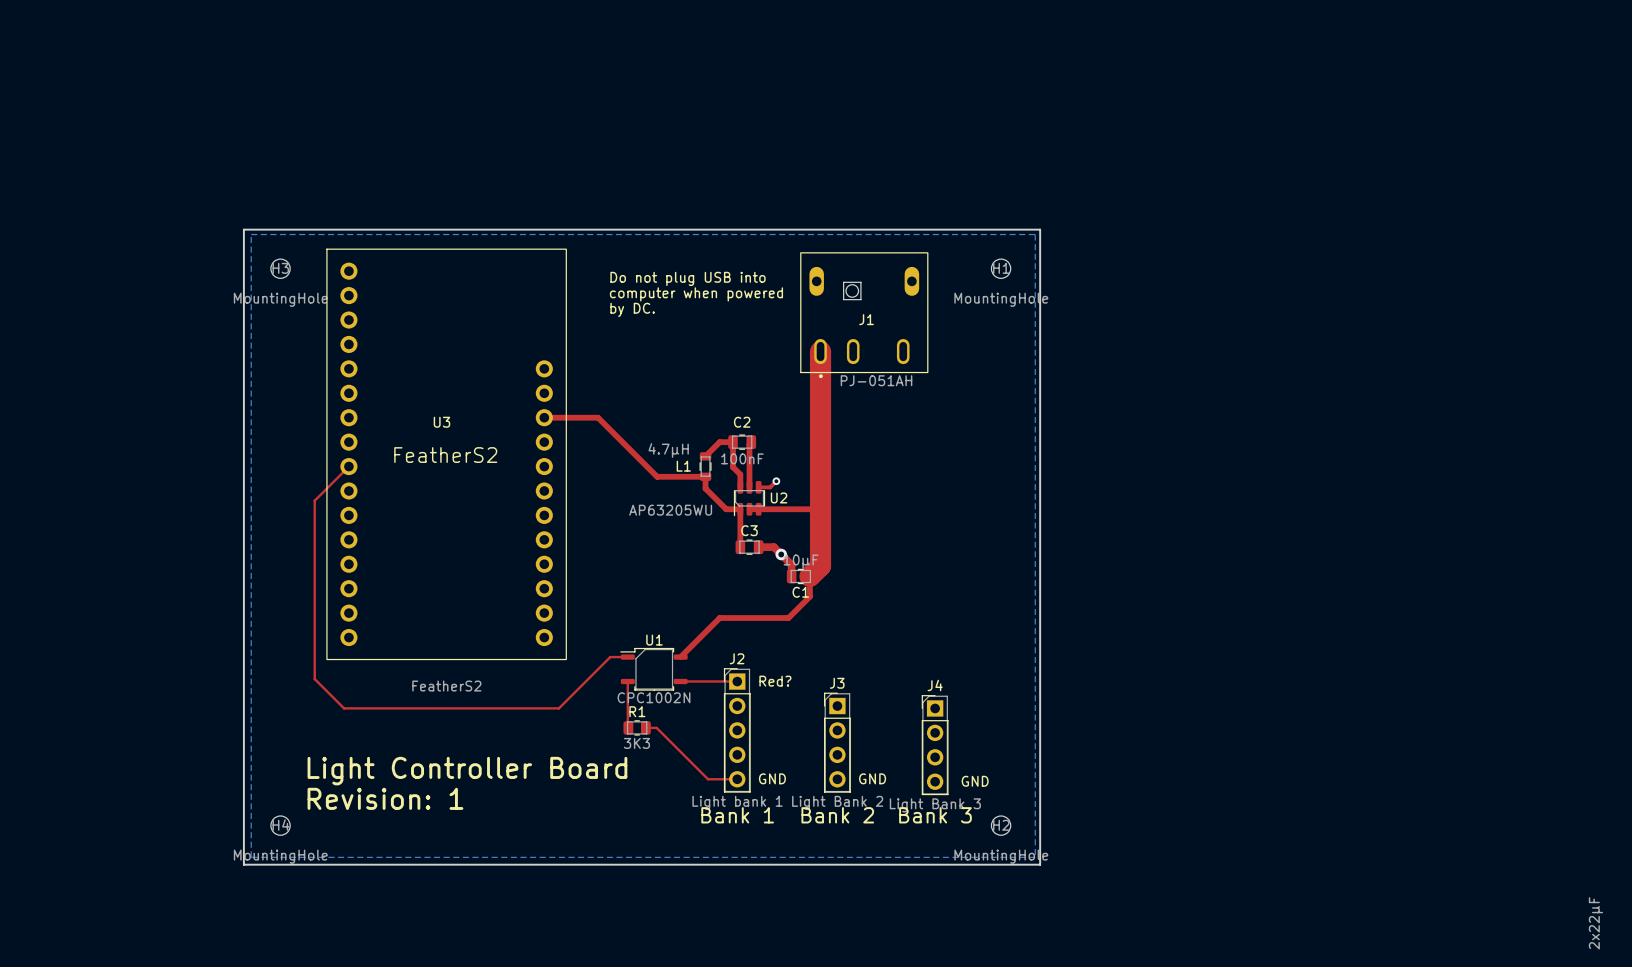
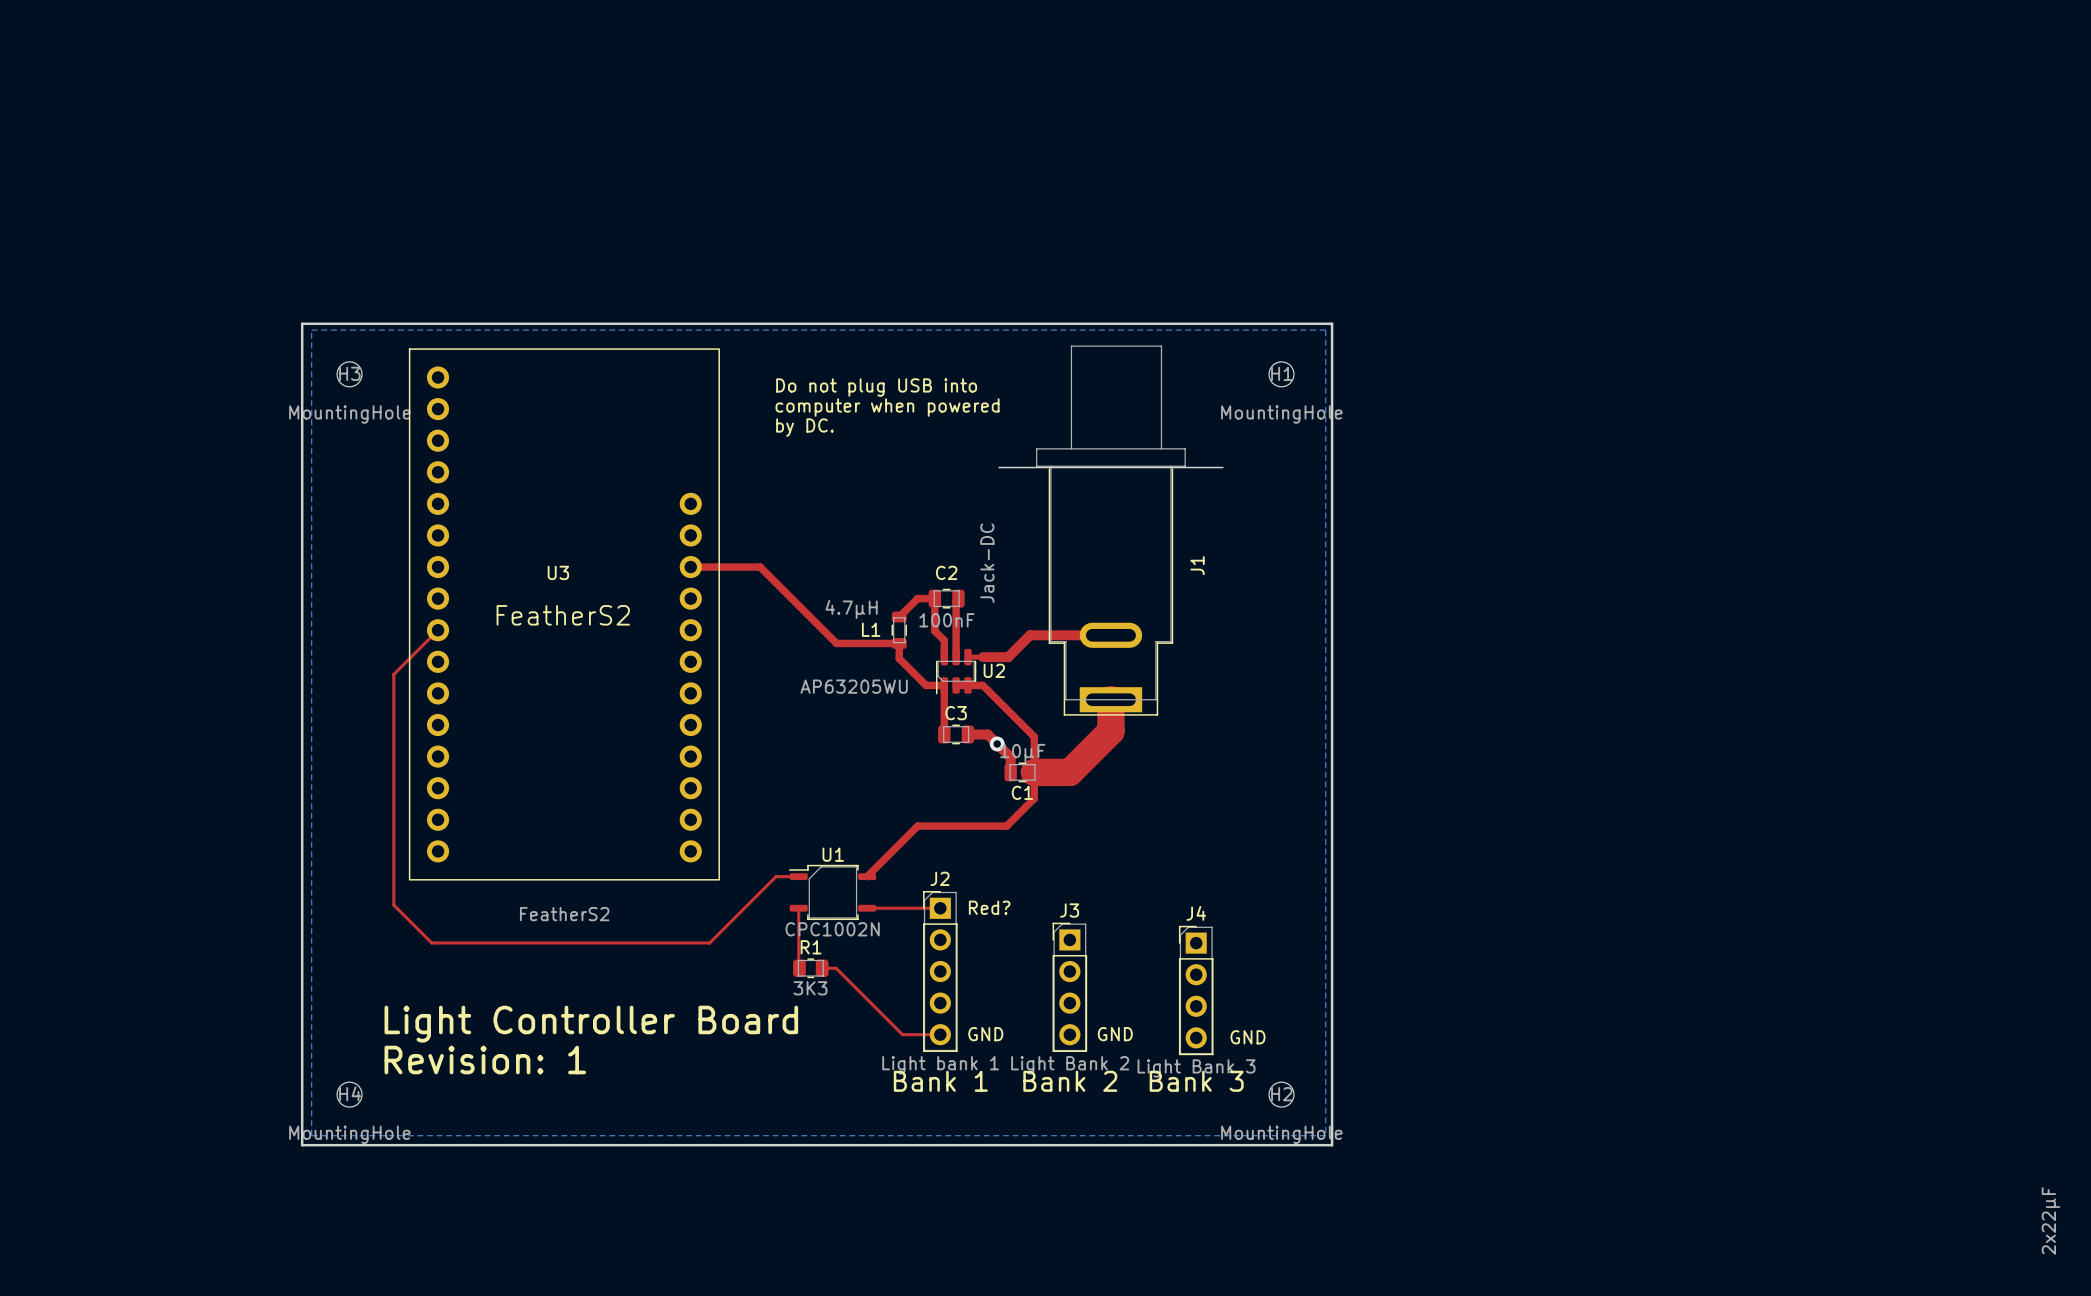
J1 footprint: [800, 252, 929, 379] -> [998, 345, 1224, 716]
J1 name position: J1 (866, 319) -> J1 (1197, 565)
top track: (820, 351) (820, 565) (809, 576) -> none
J1 value: PJ-051AH (876, 380) -> Jack-DC (987, 563)
top track: (776, 481) (770, 487) -> (1110, 635) (1030, 635) (1008, 657) (982, 657)
via: (776, 481) -> none
top track: (770, 509) (820, 510) -> (982, 685) (1034, 736) (1034, 772) (1069, 772) (1110, 731) (1110, 699)

